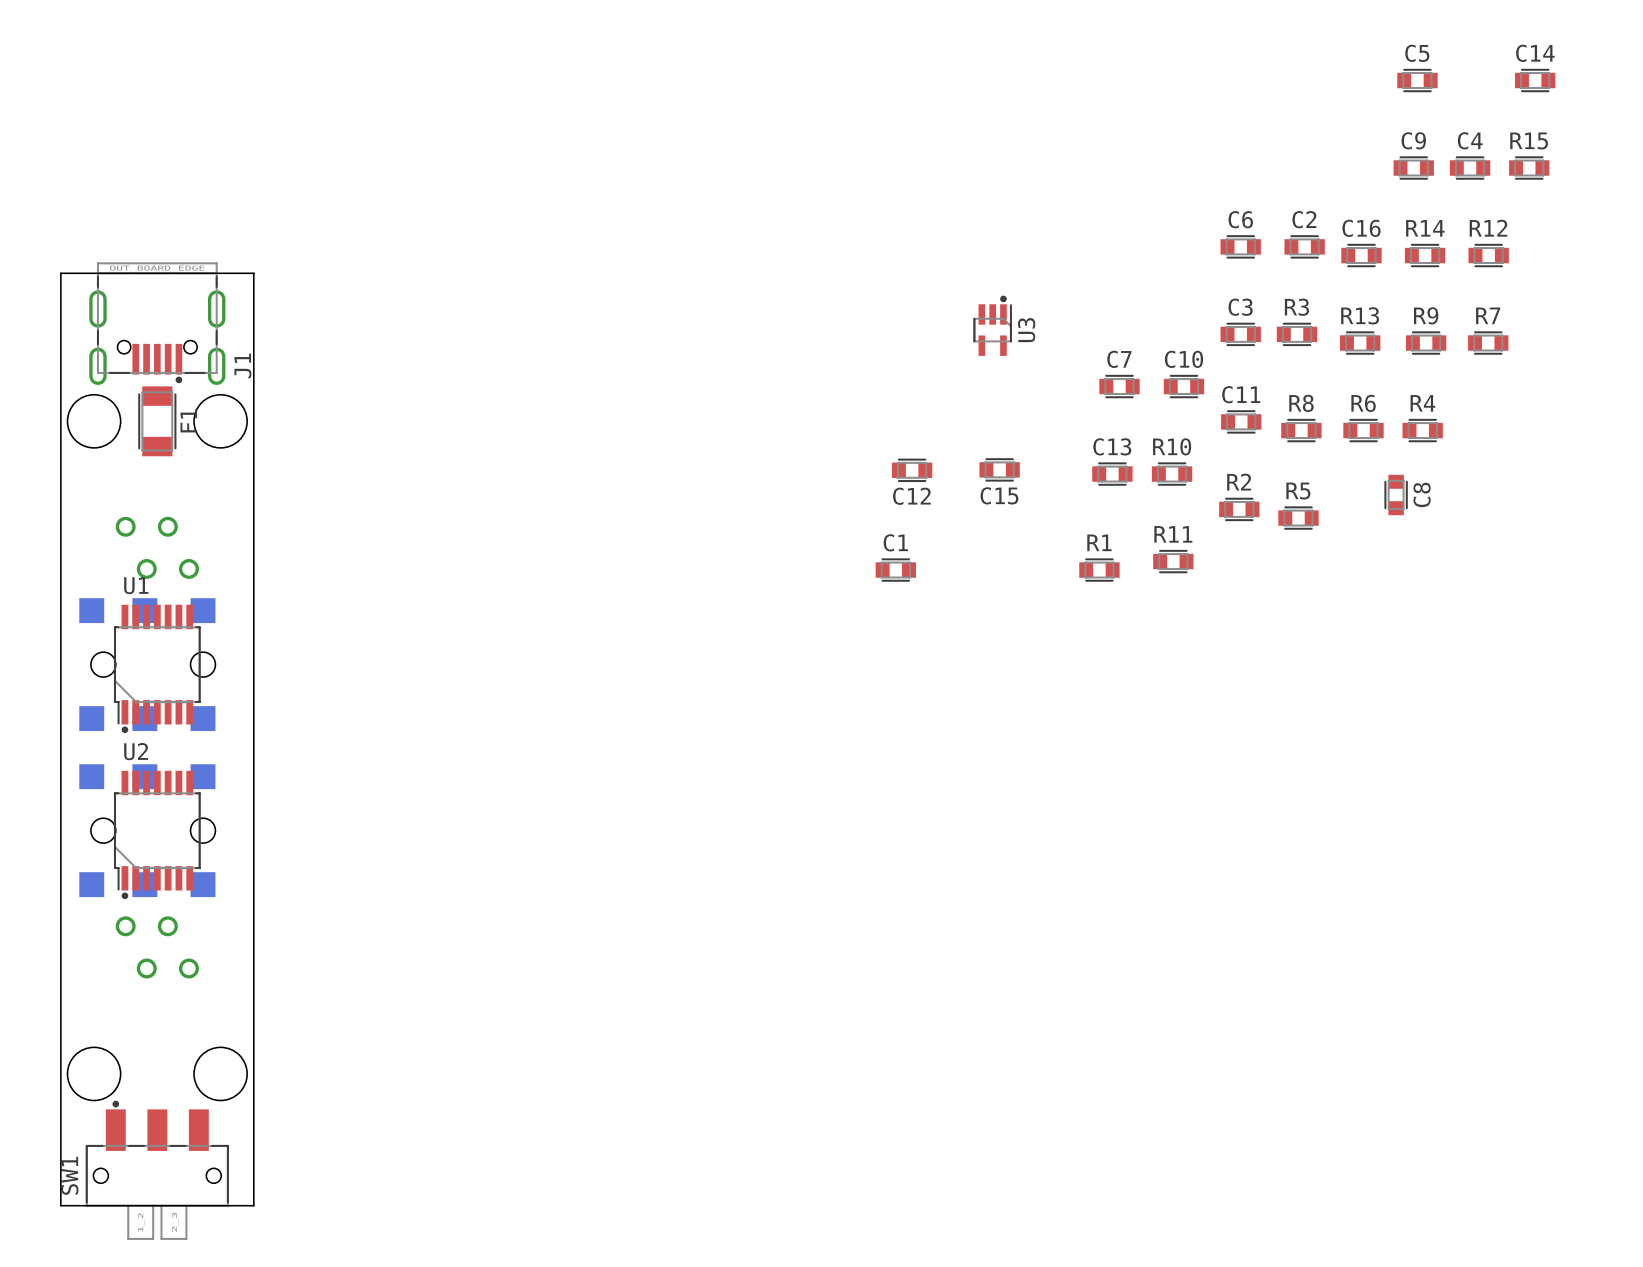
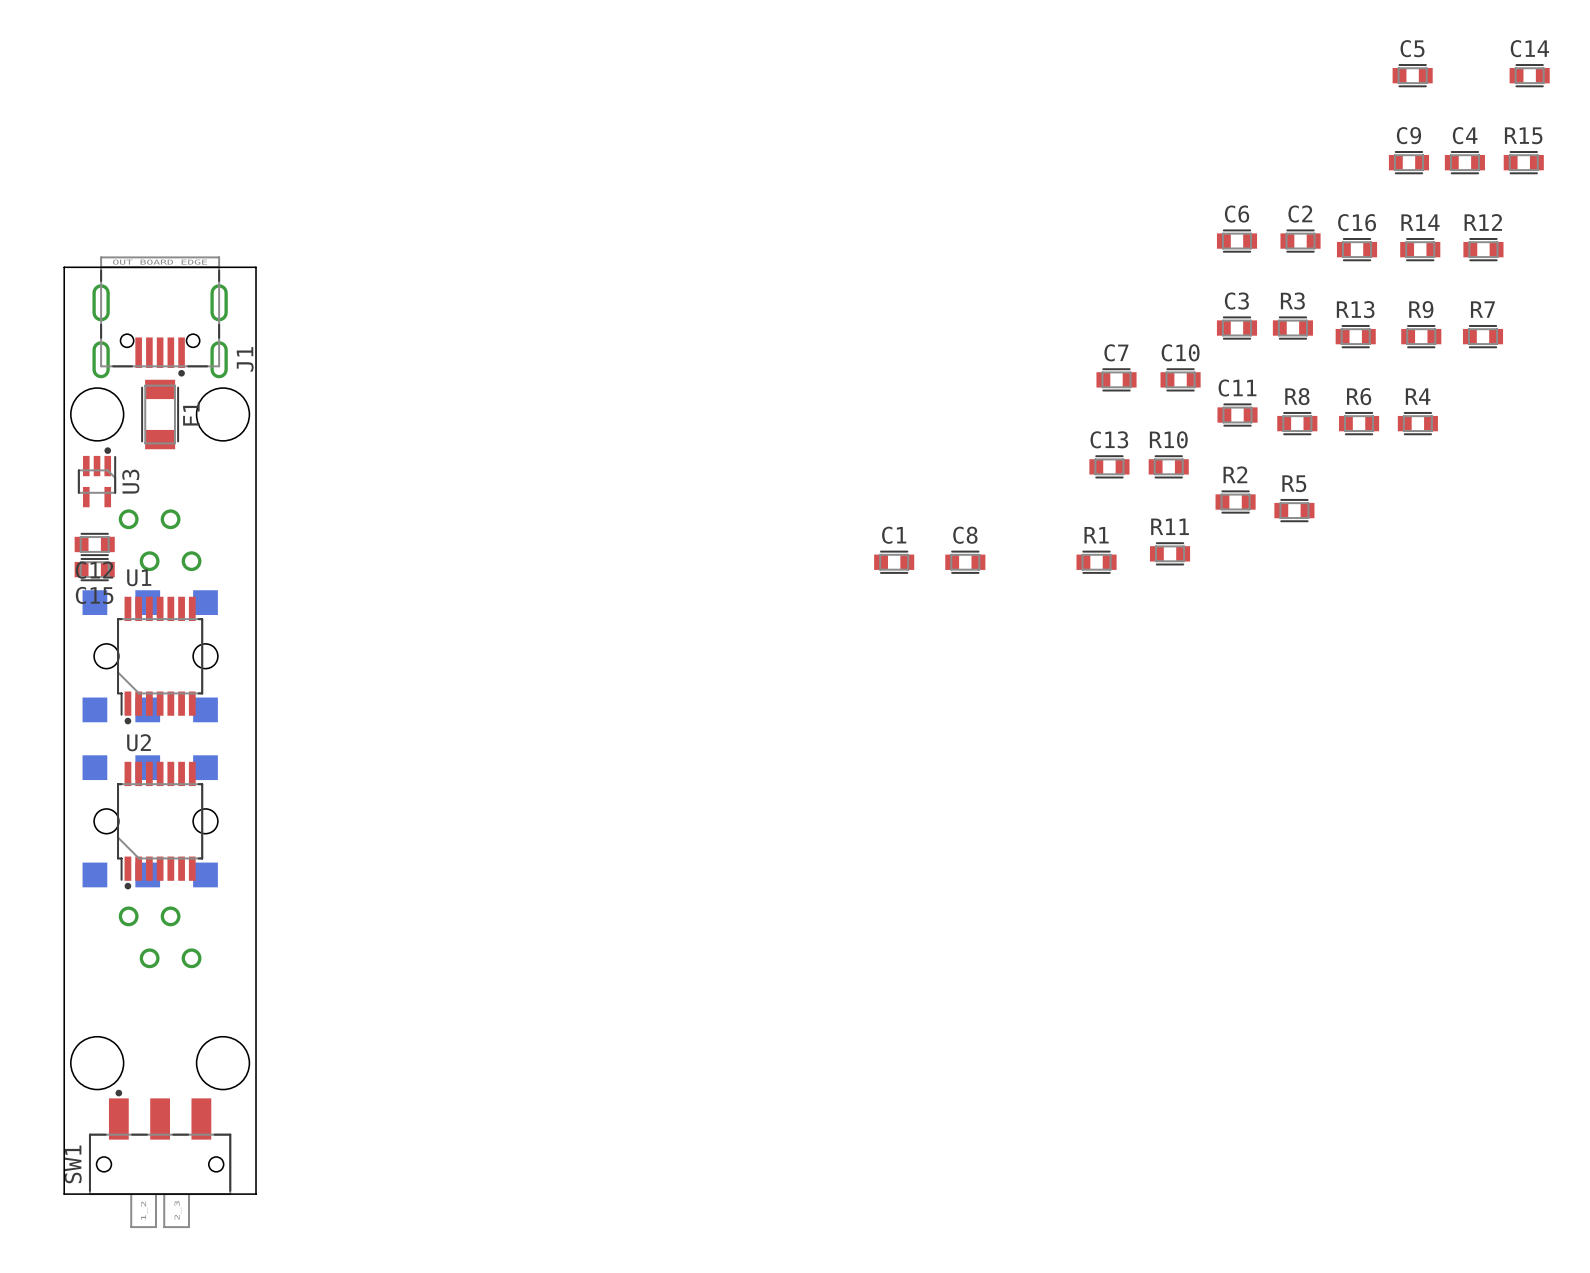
U3 position: (992, 325) -> (97, 477)
C15 position: (999, 469) -> (94, 569)
C12 position: (912, 470) -> (94, 544)
C8 rotation: 0° (1396, 494) -> 90° clockwise (965, 562)
C8 position: (1396, 494) -> (965, 562)
C8 name position: C8 (1422, 494) -> C8 (965, 535)

